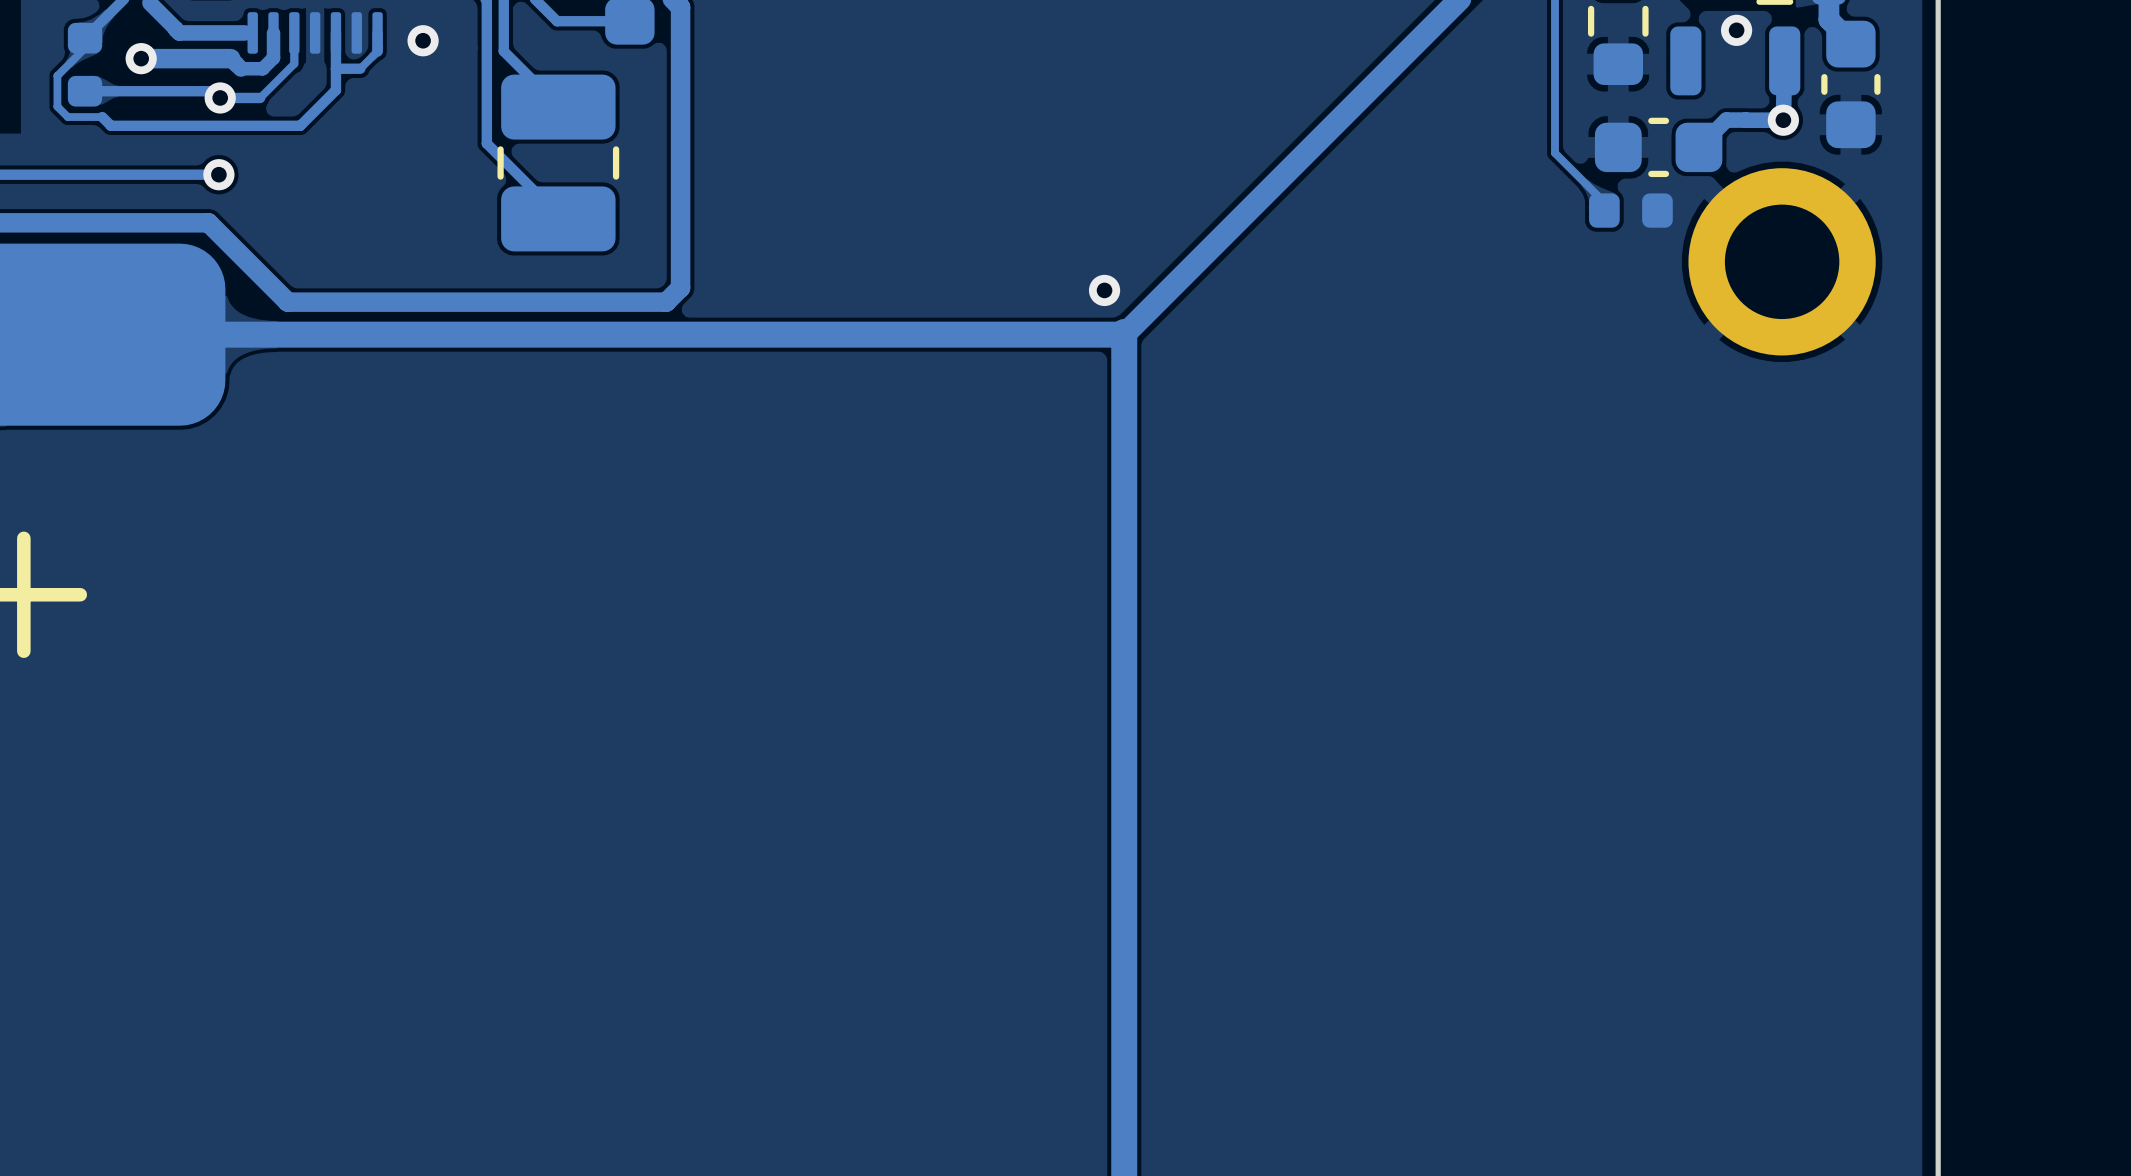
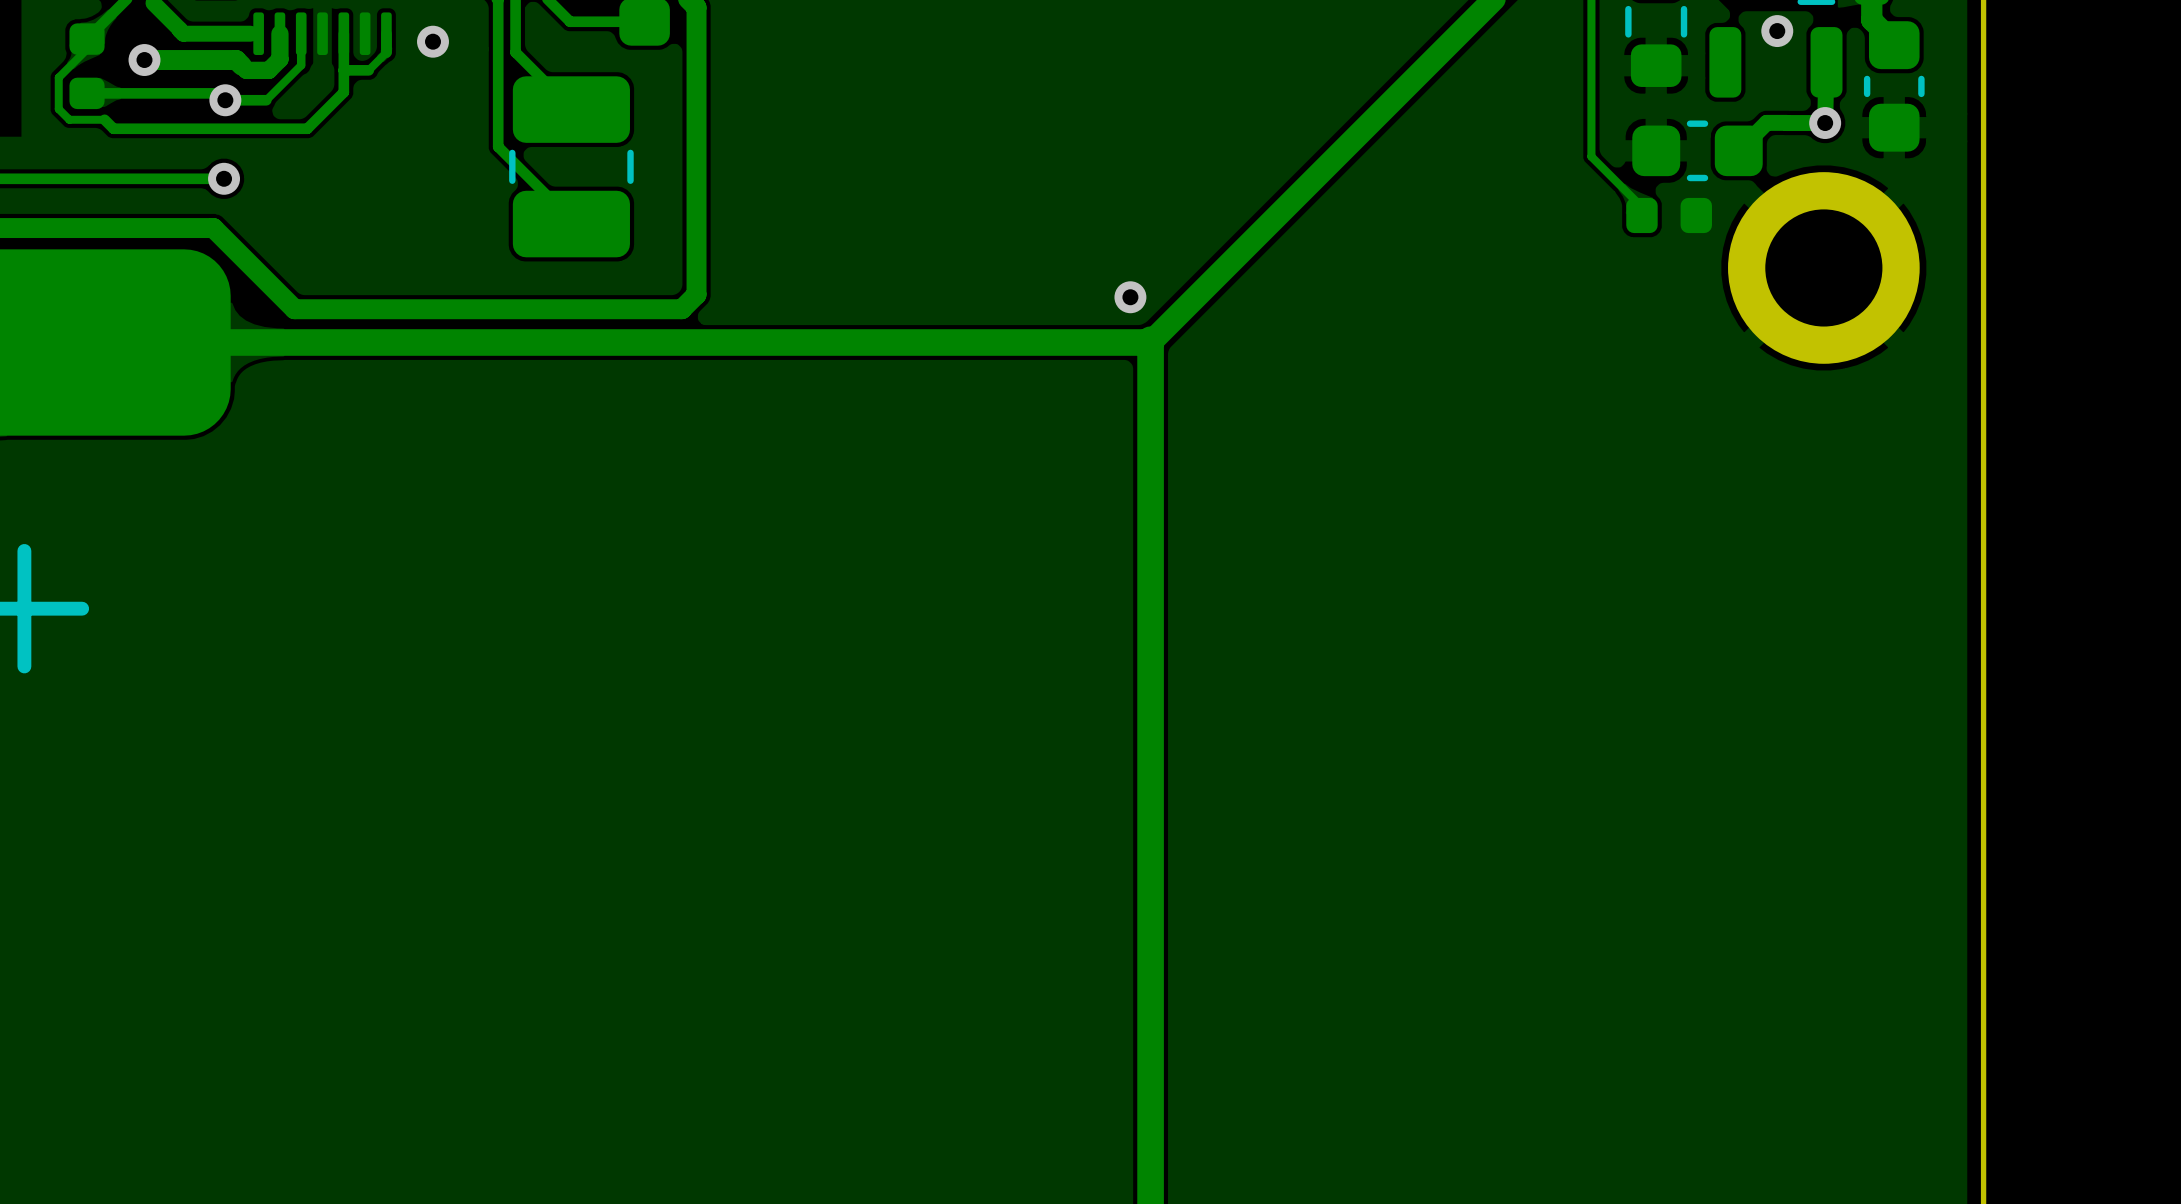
track width: thin (273, 32) (273, 57) (262, 68) (240, 68) (230, 58) -> thick (279, 33) (279, 59) (268, 70) (246, 70) (236, 60)

